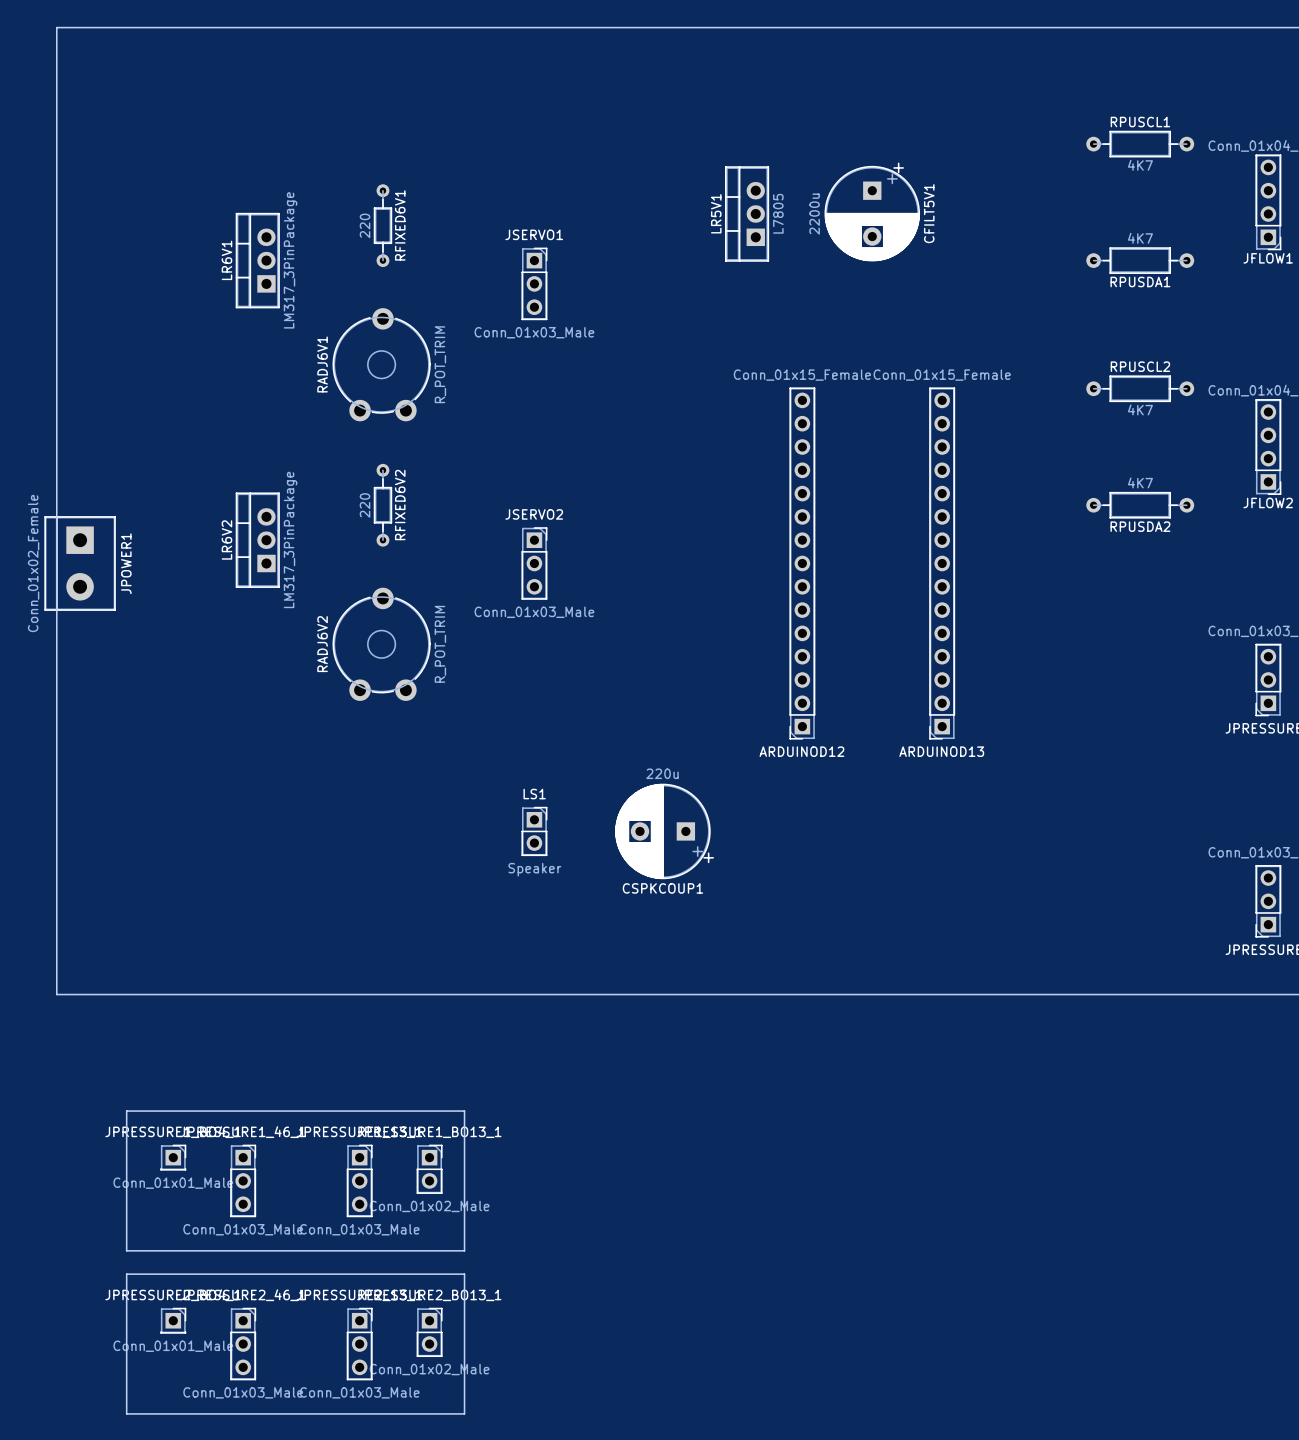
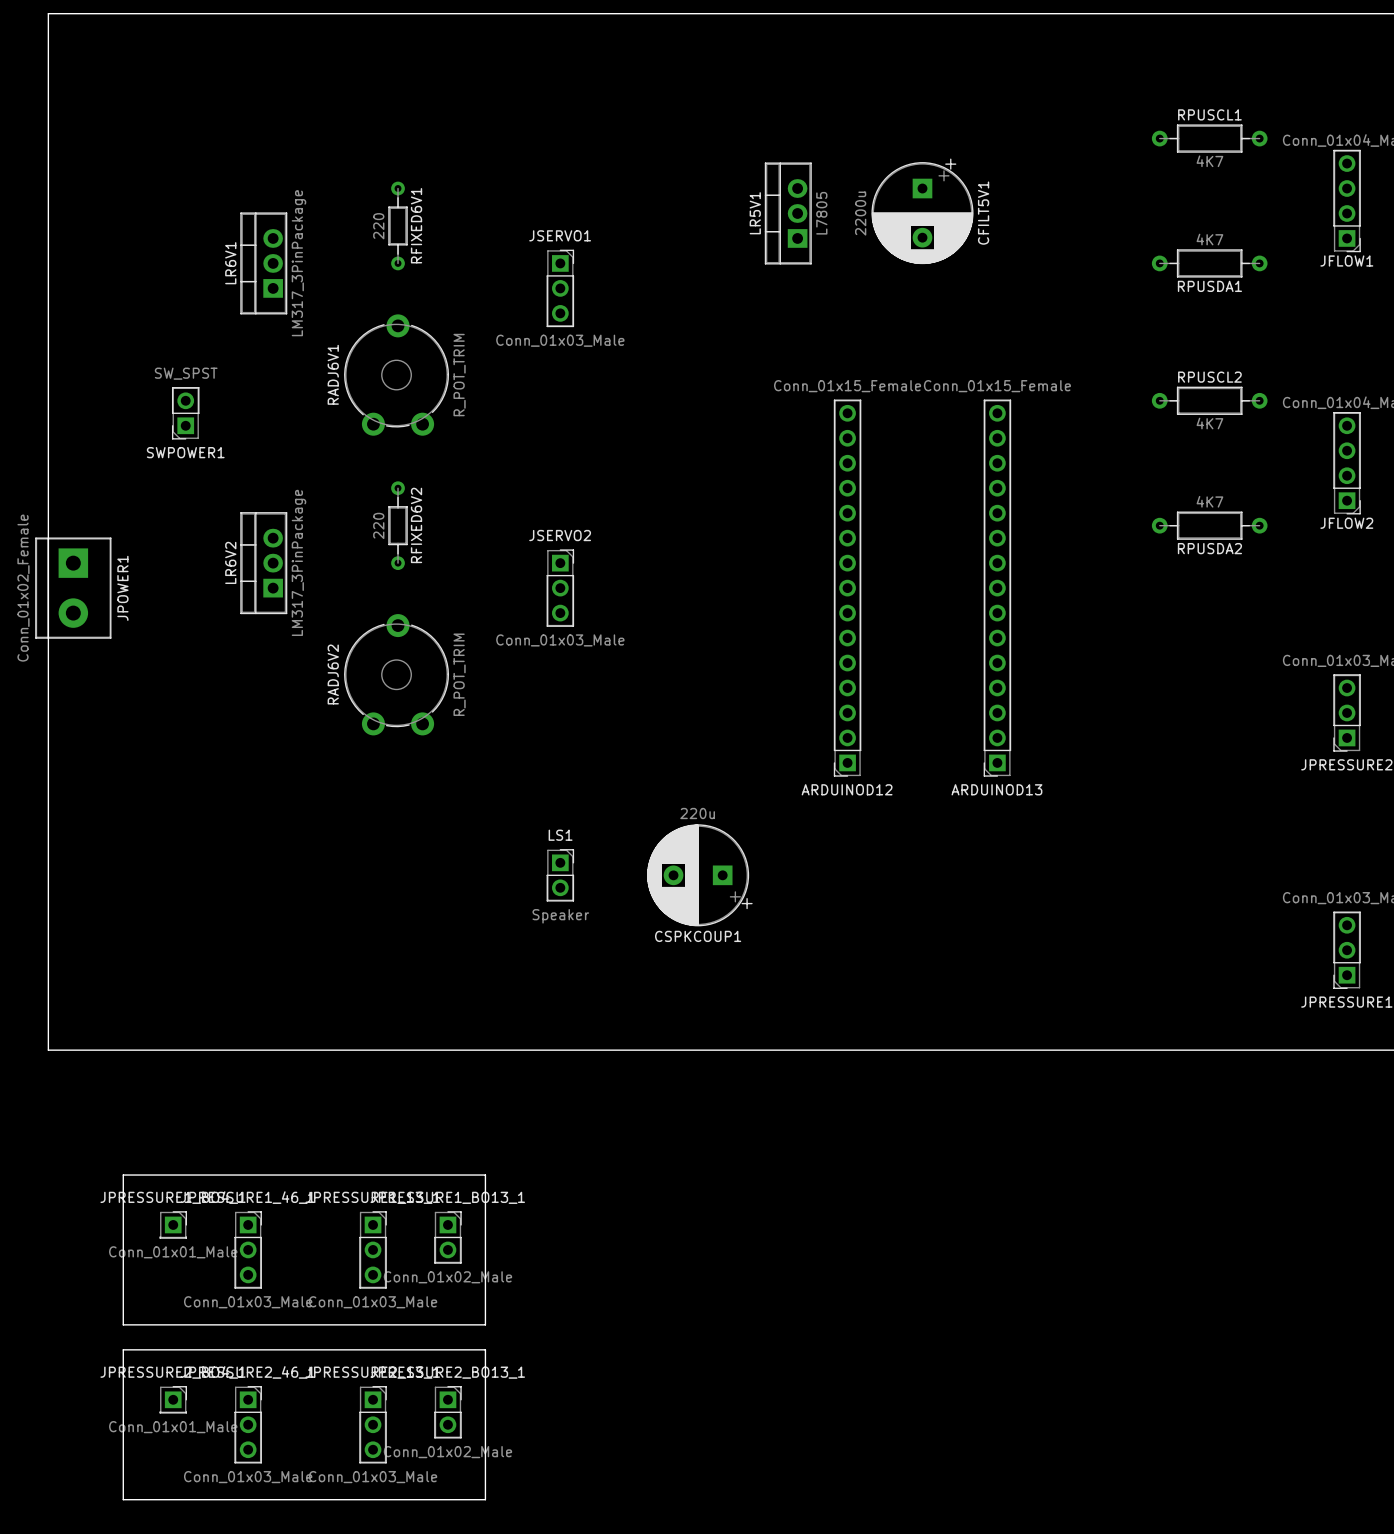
SWPOWER1: none -> SW_SPST (185, 413)

